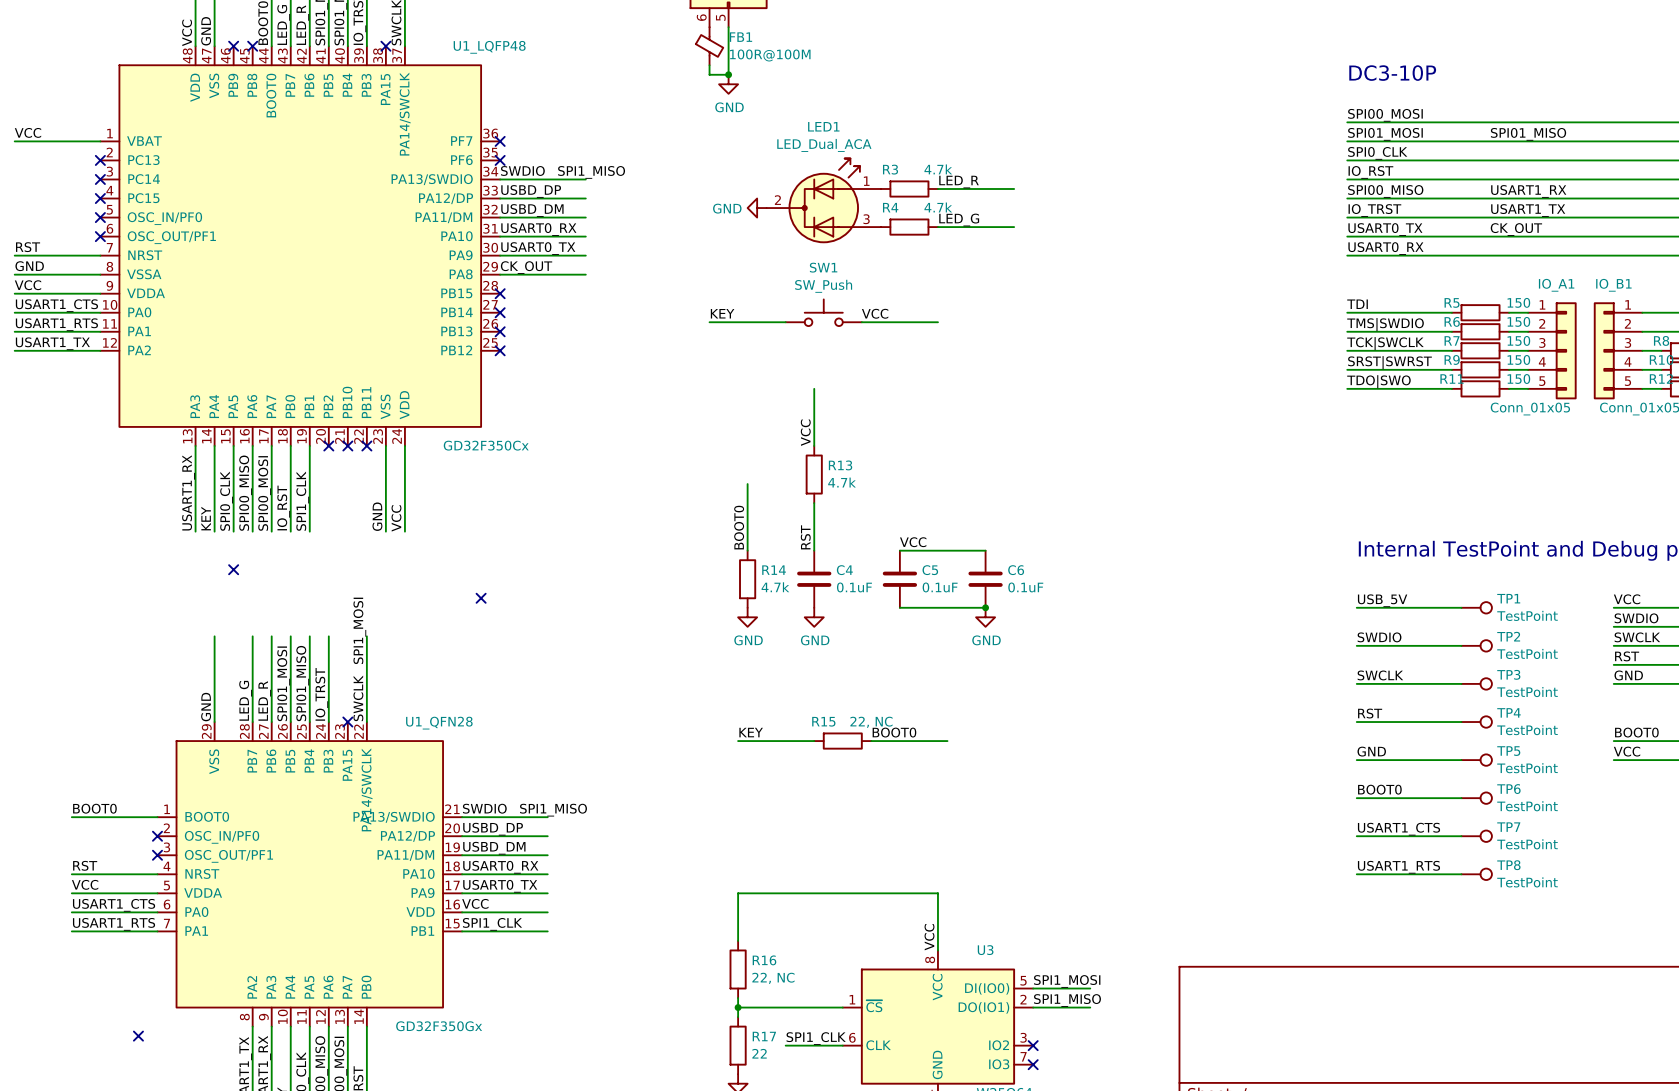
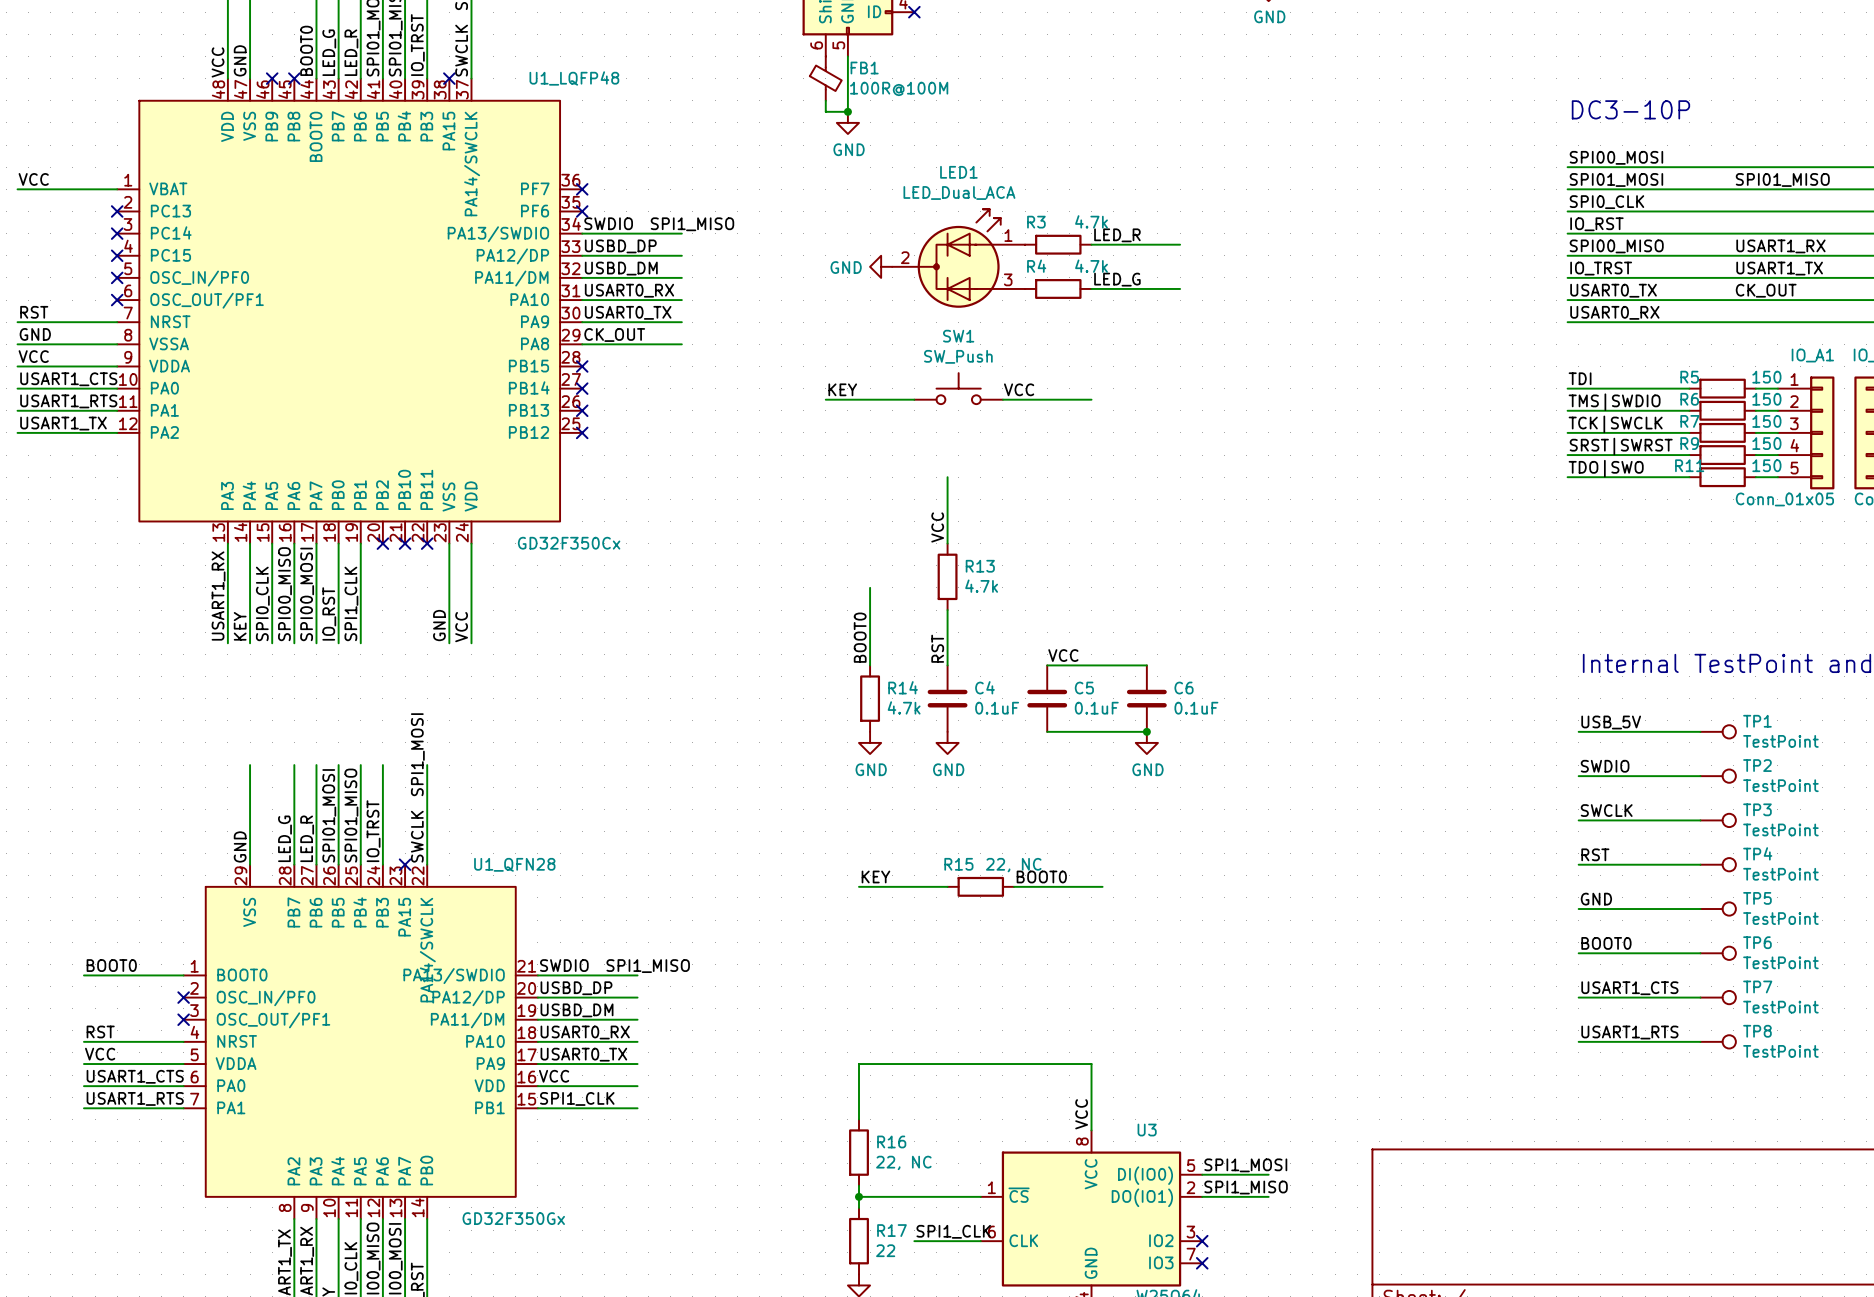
no-connect mark: (233, 569) -> none
no-connect mark: (481, 598) -> none
no-connect mark: (138, 1036) -> none

